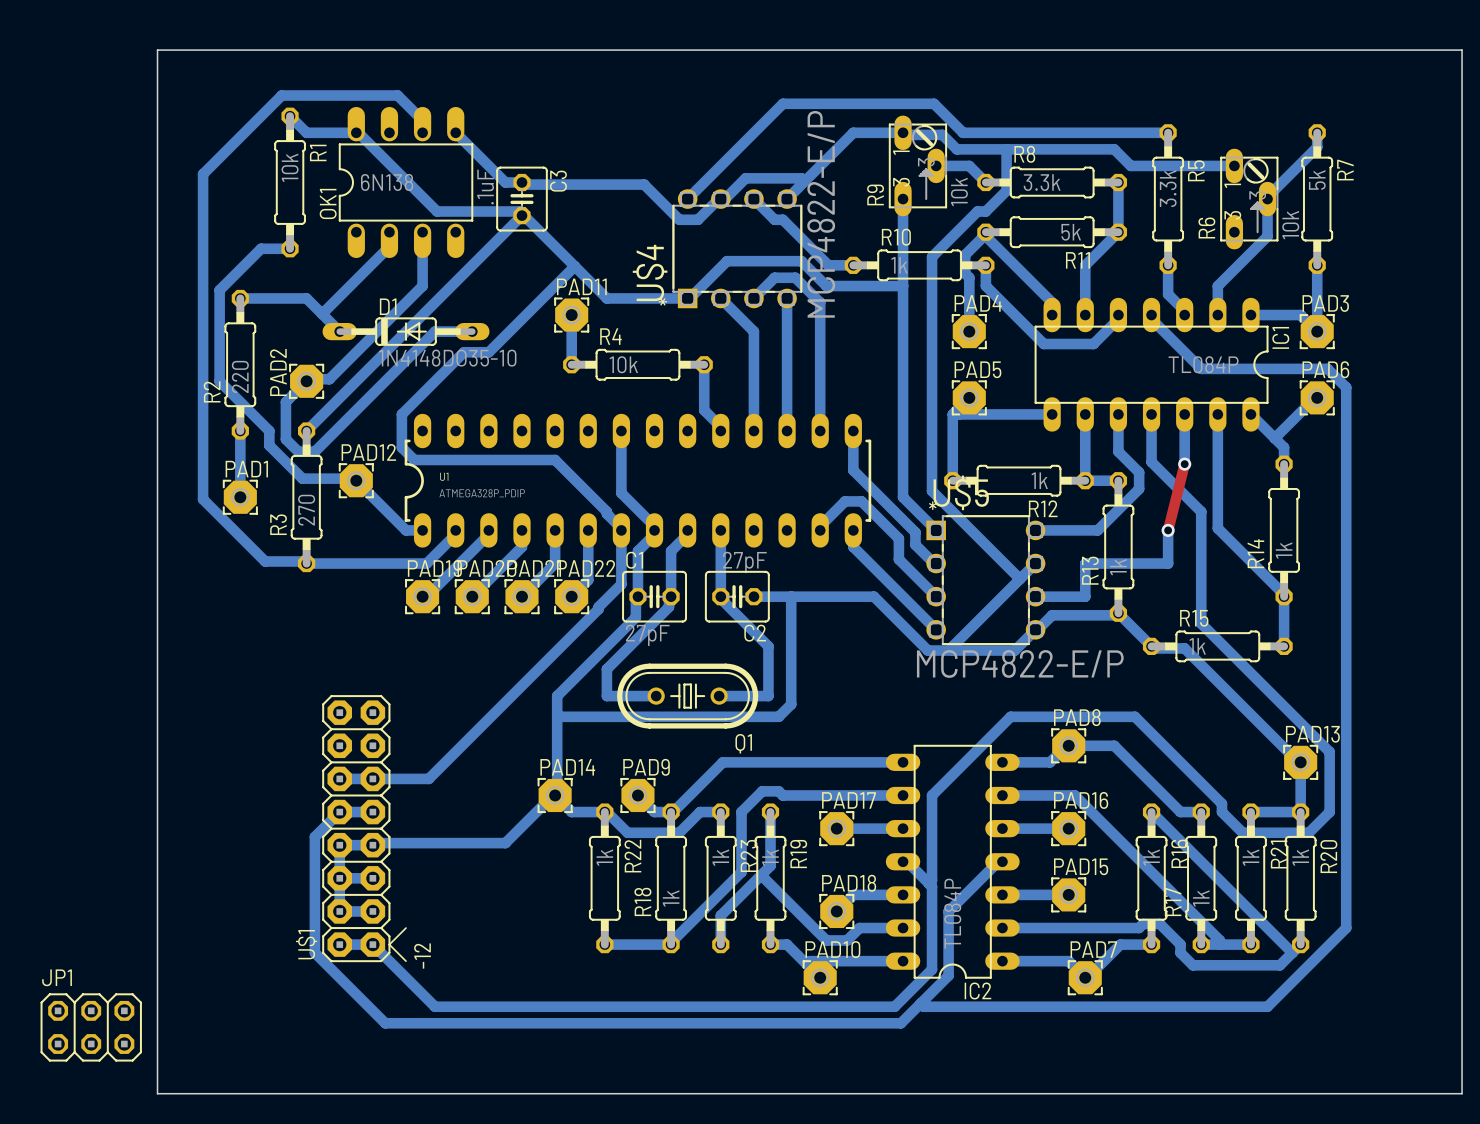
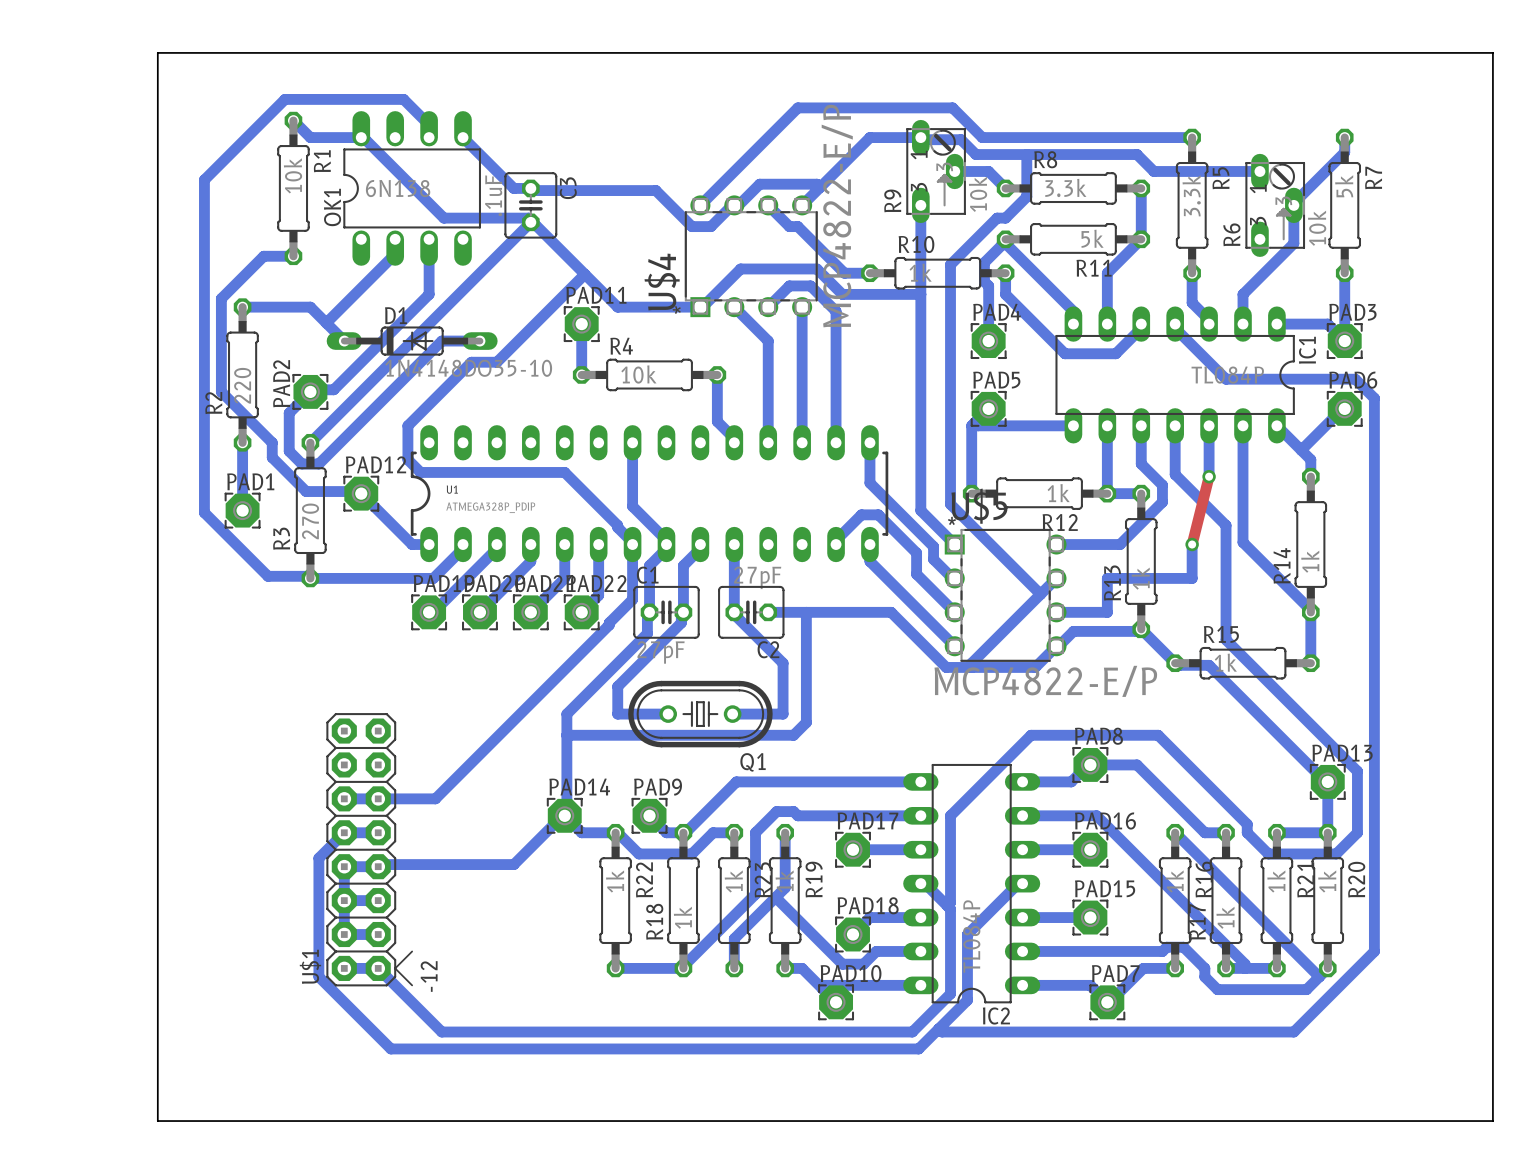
JP1: (91, 1027) -> none

